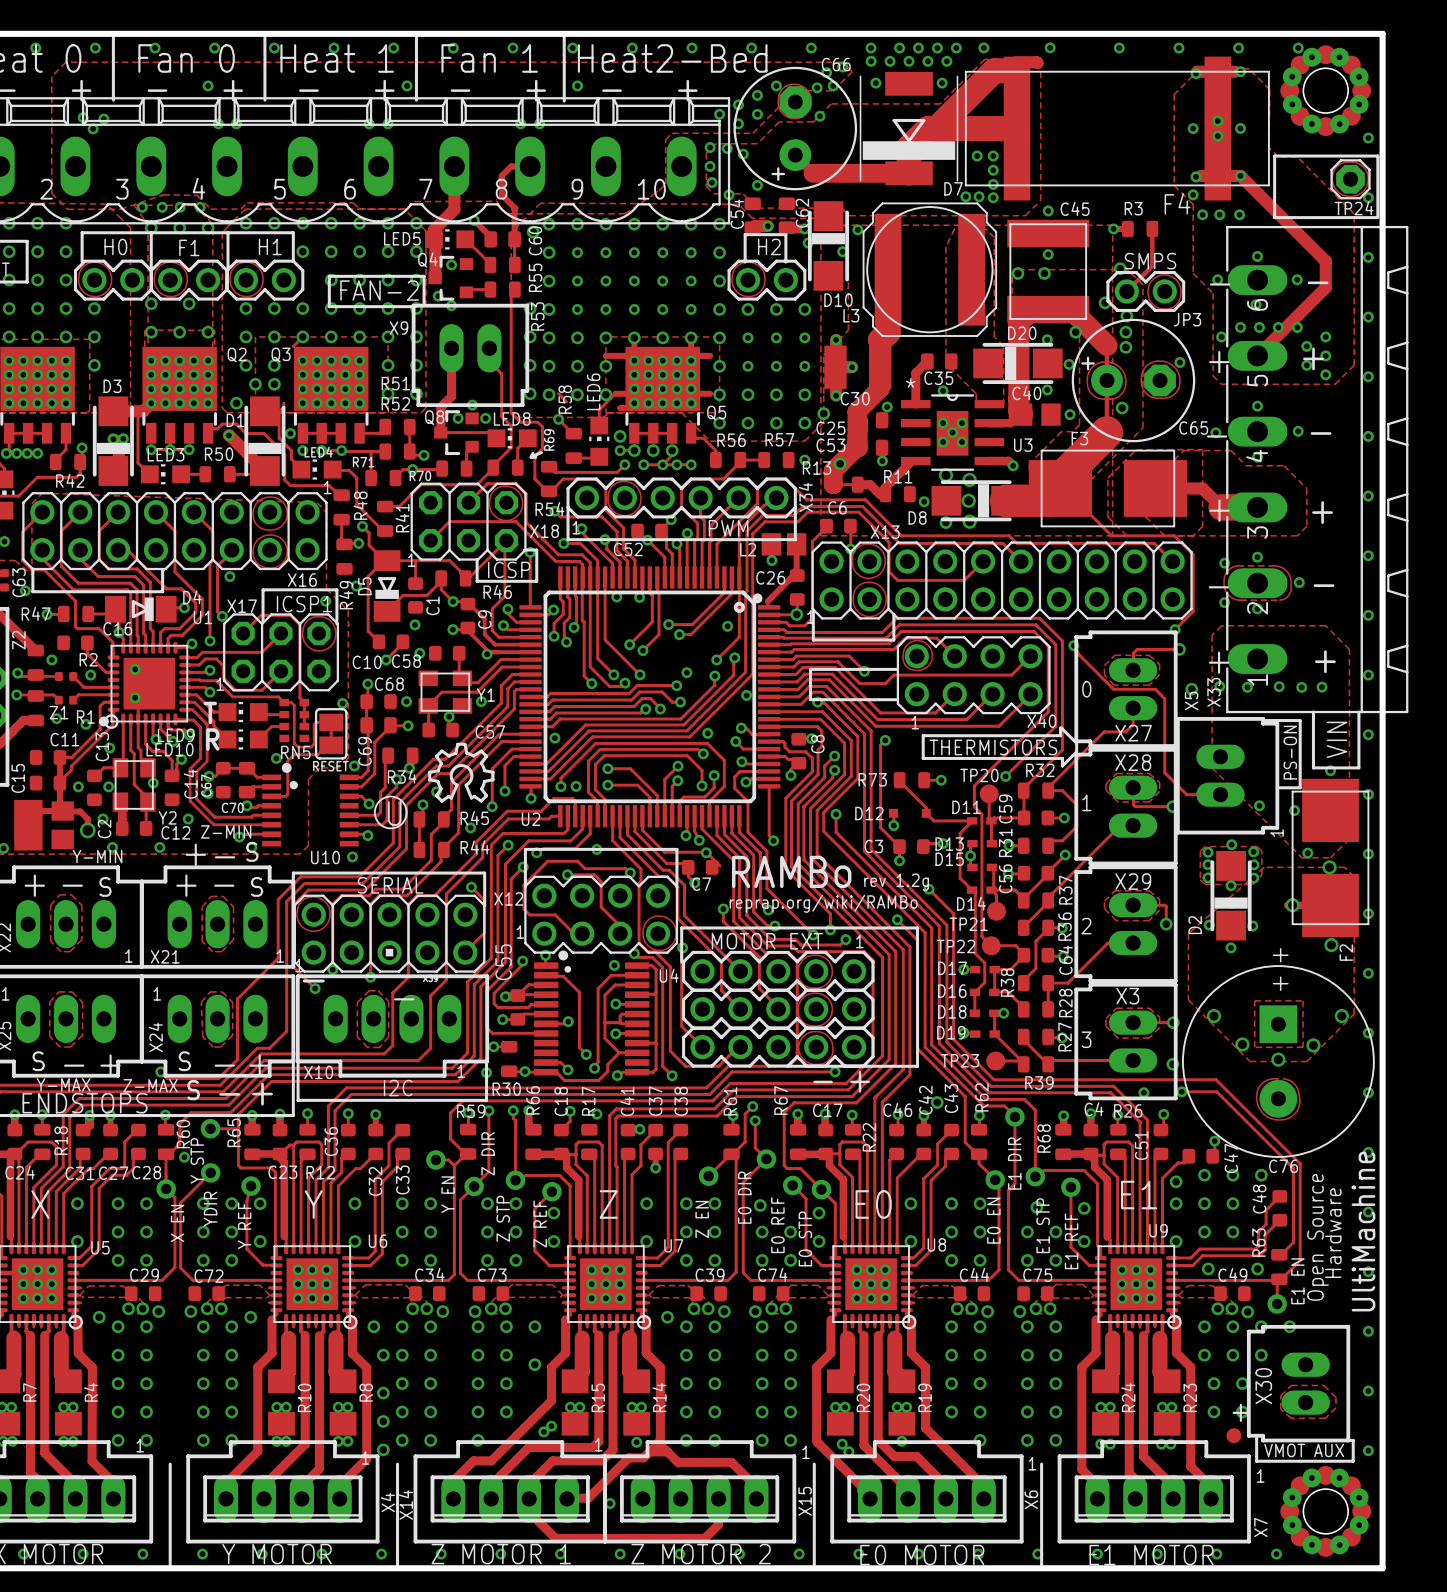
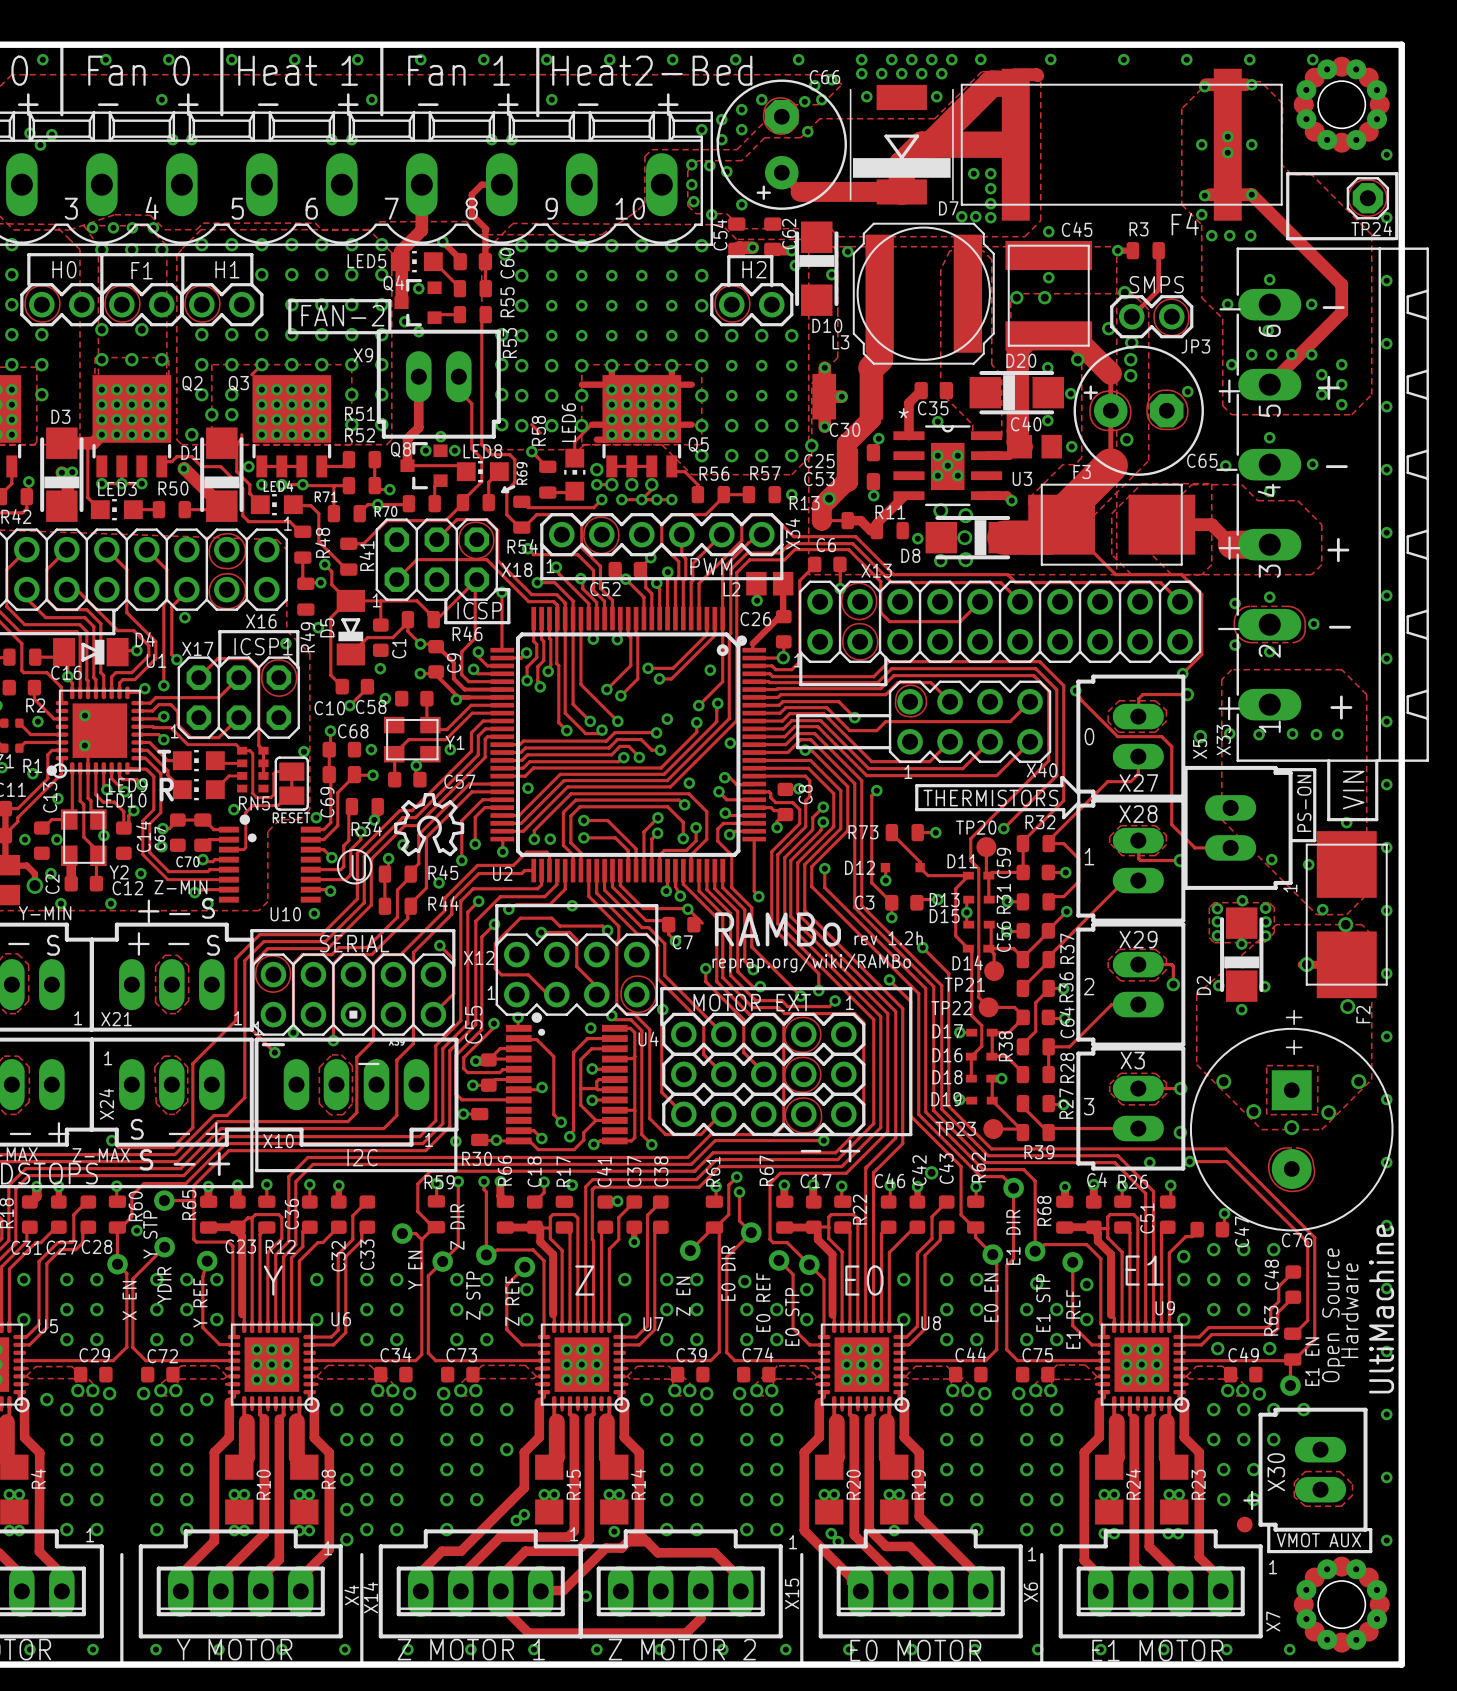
text: rev 1.2g (896, 882) -> rev 1.2h (888, 938)

